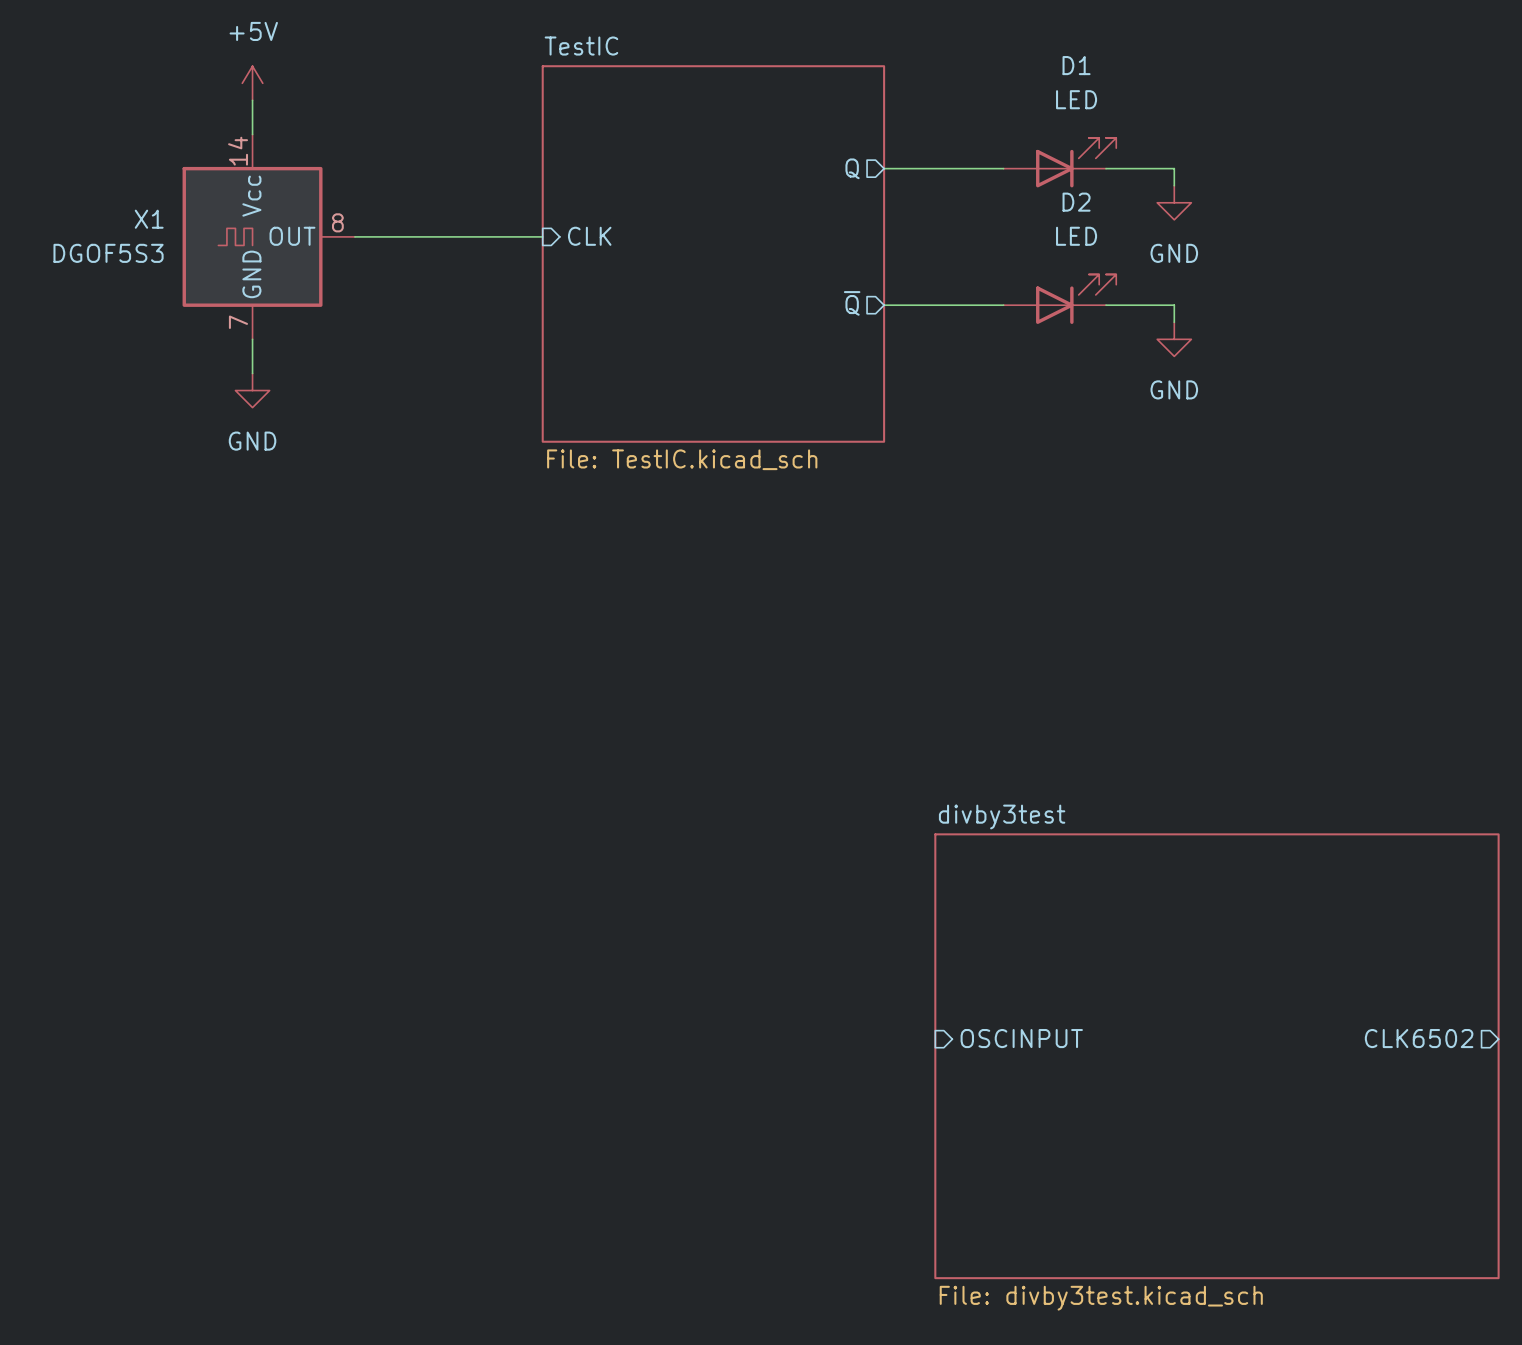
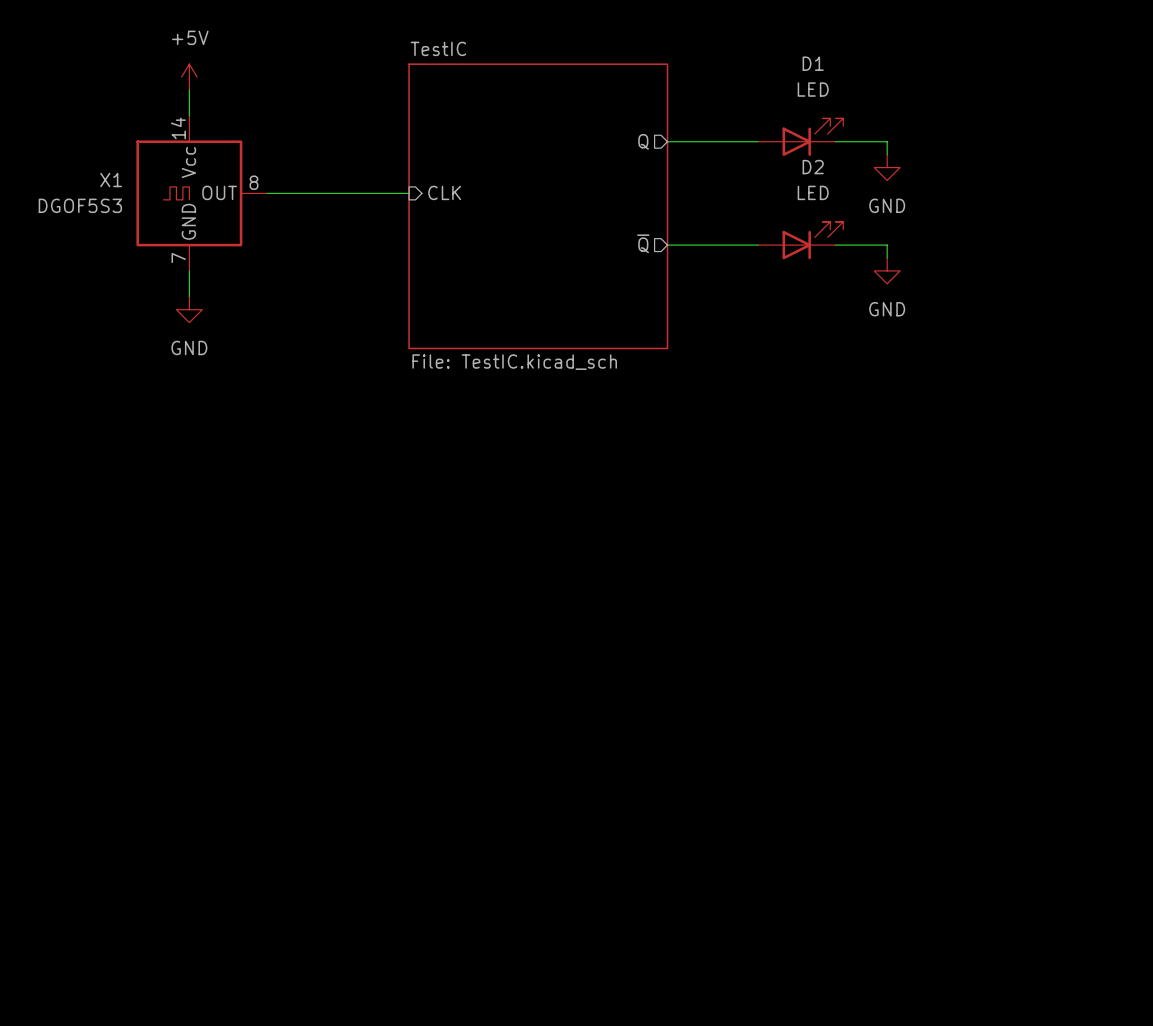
sheet pin: OSCINPUT (1021, 1038) -> none
sheet pin: CLK6502 (1419, 1038) -> none
sheet divby3test: File: divby3test.kicad_sch (1216, 1056) -> none

